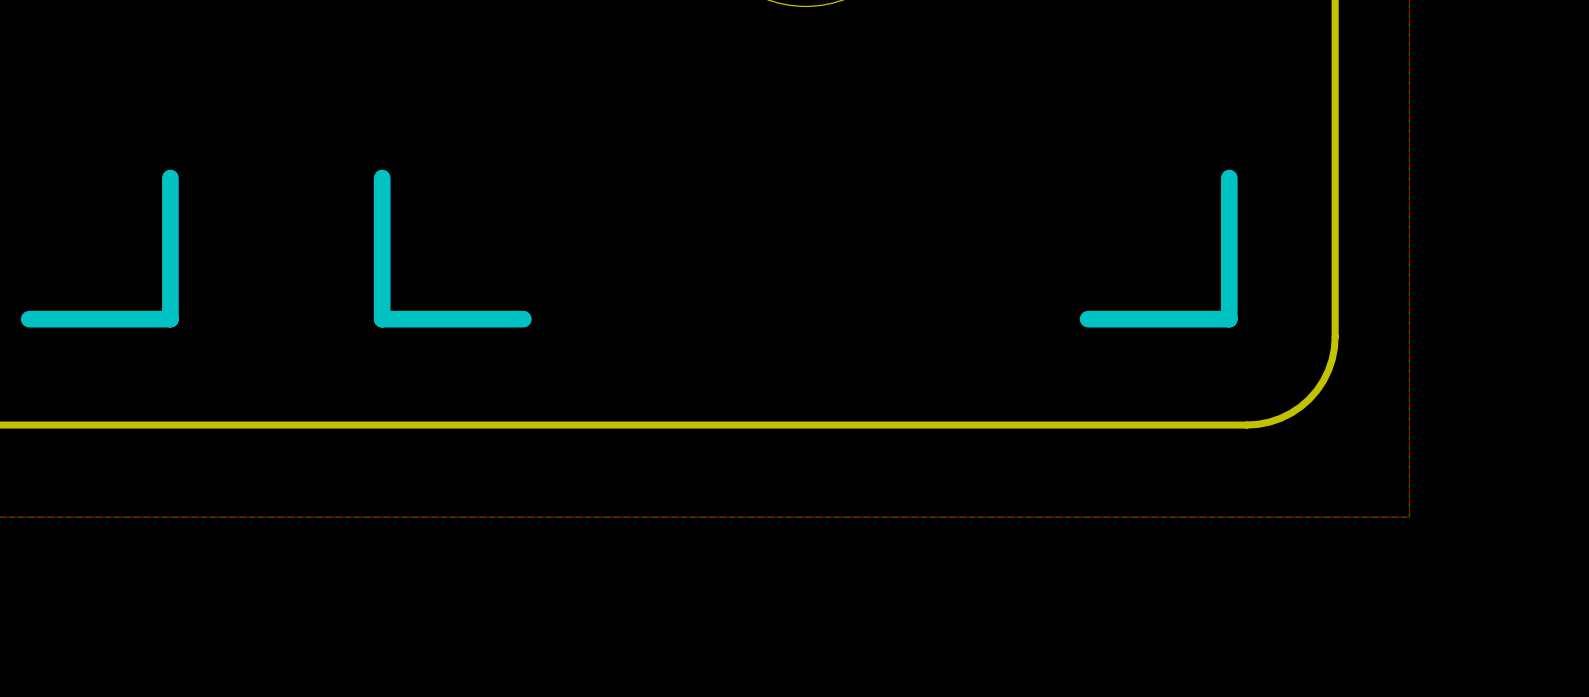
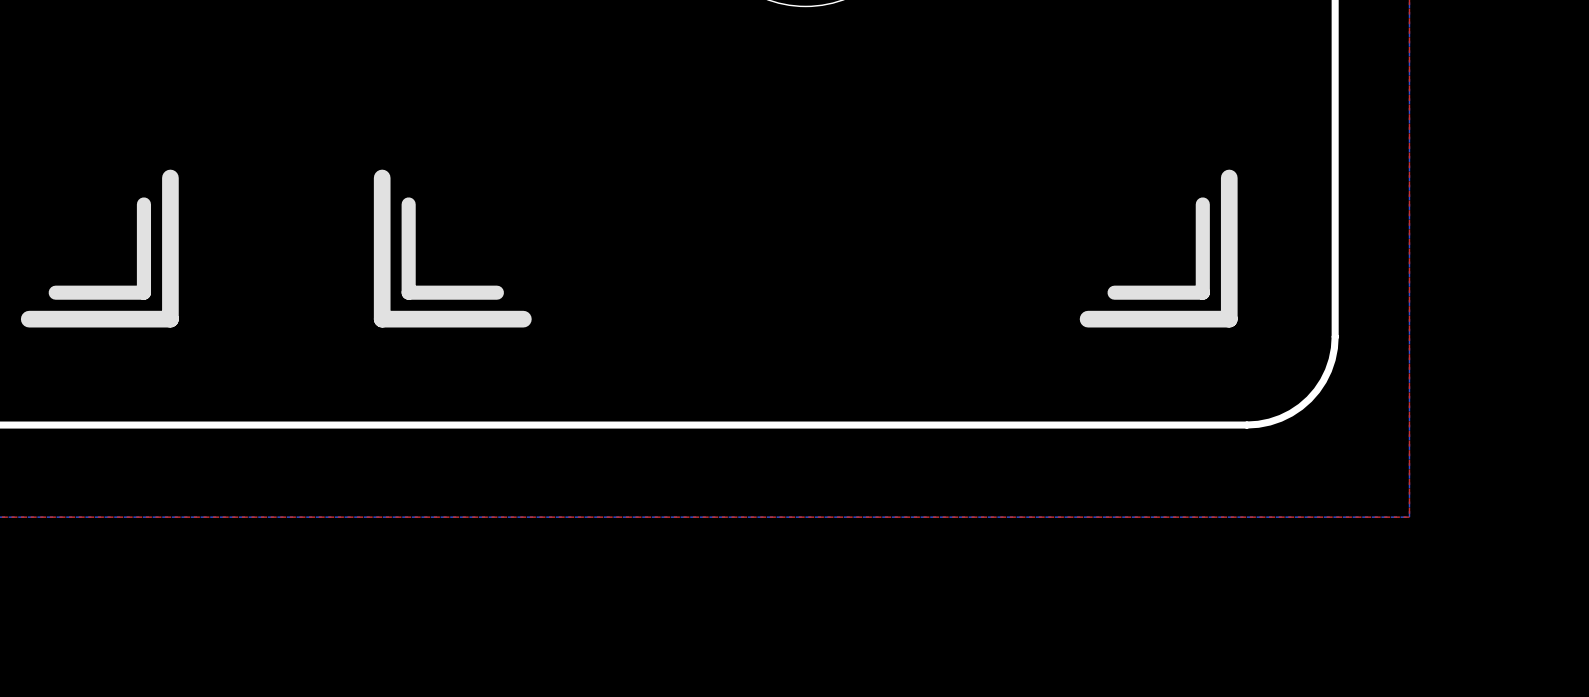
line: none -> (143, 204) (143, 292) (55, 292)
line: none -> (408, 204) (408, 292) (496, 292)
line: none -> (1202, 204) (1202, 292) (1114, 292)

